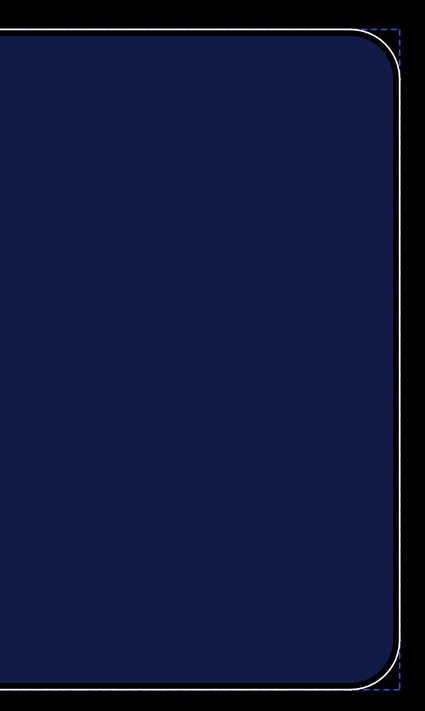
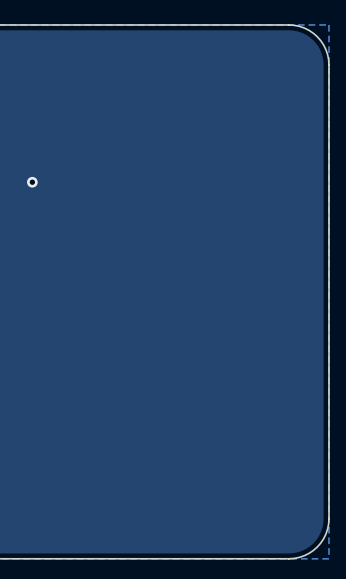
via: none -> (32, 182)

